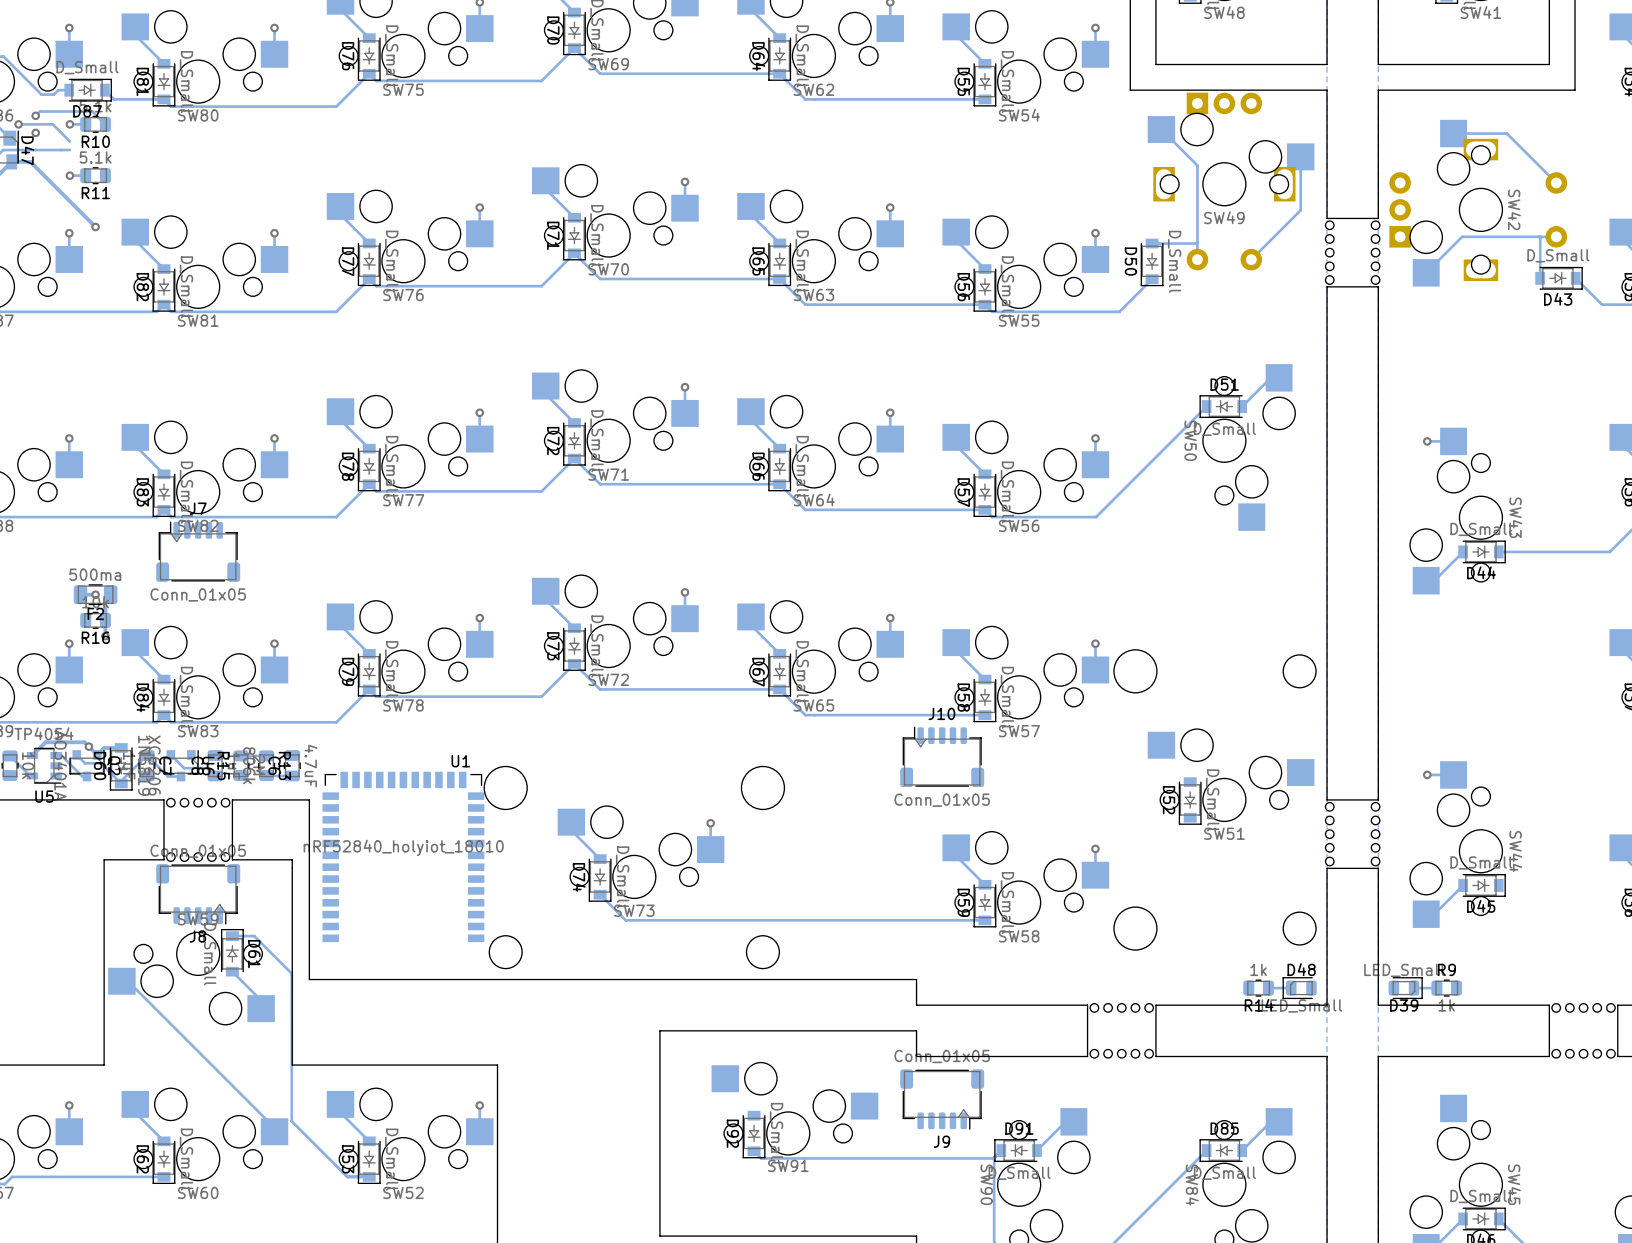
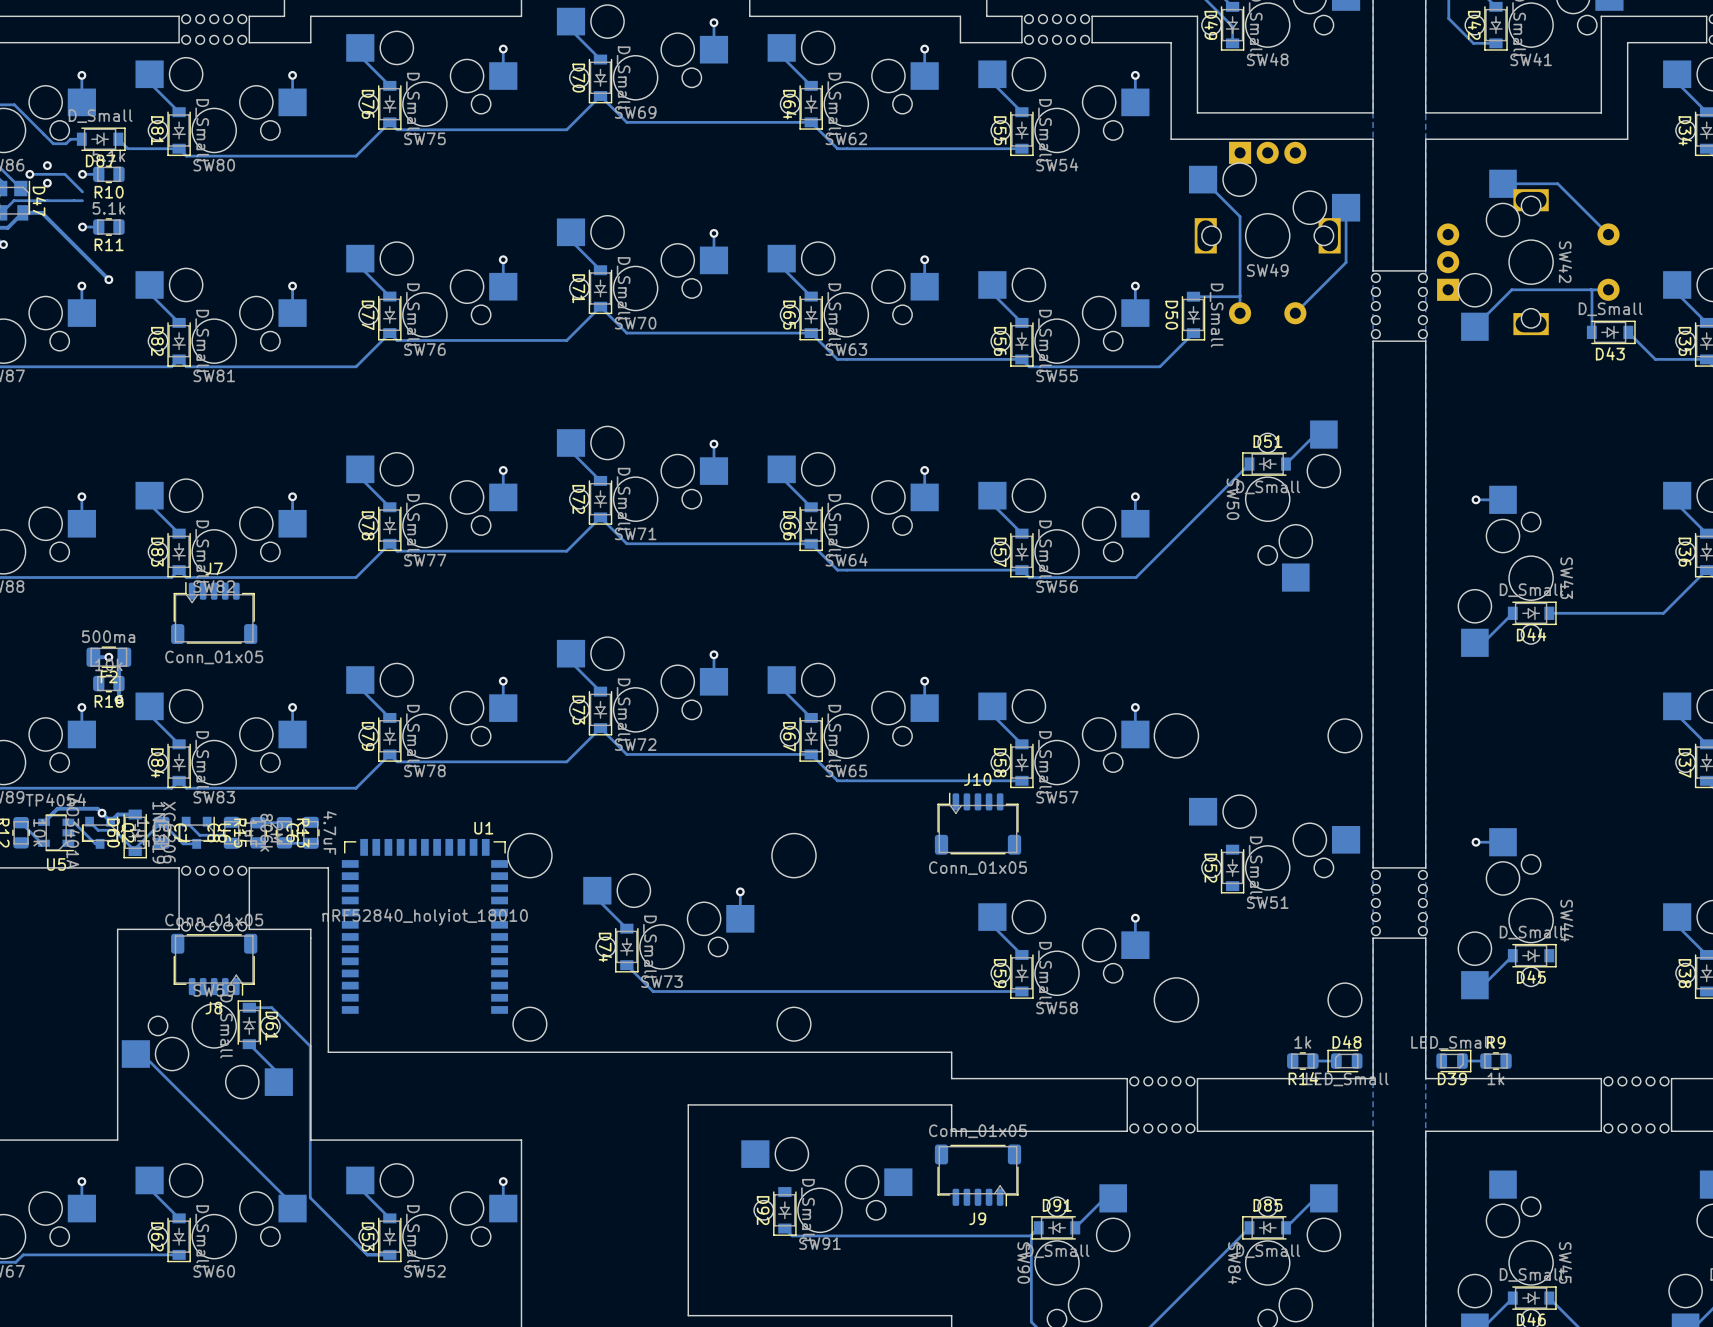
track: (35, 115) (40, 111) (92, 111) (105, 124) -> none

